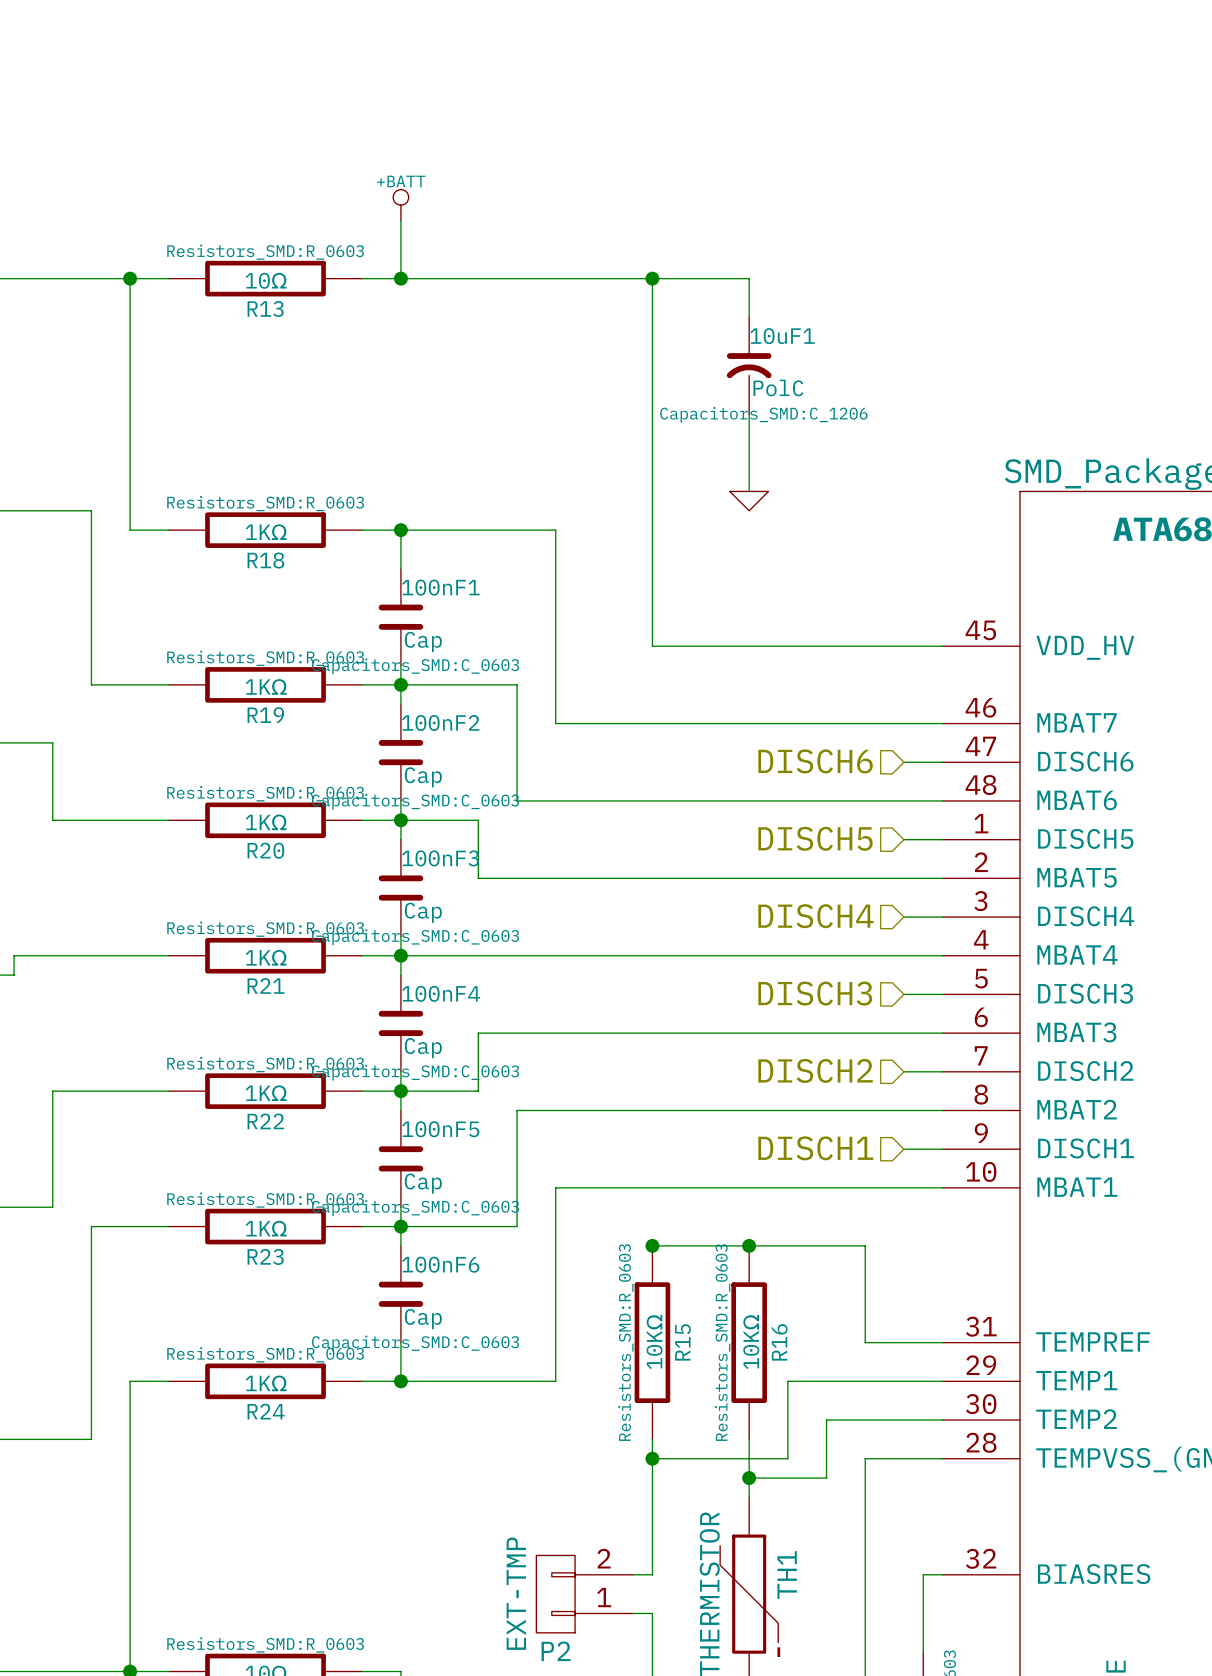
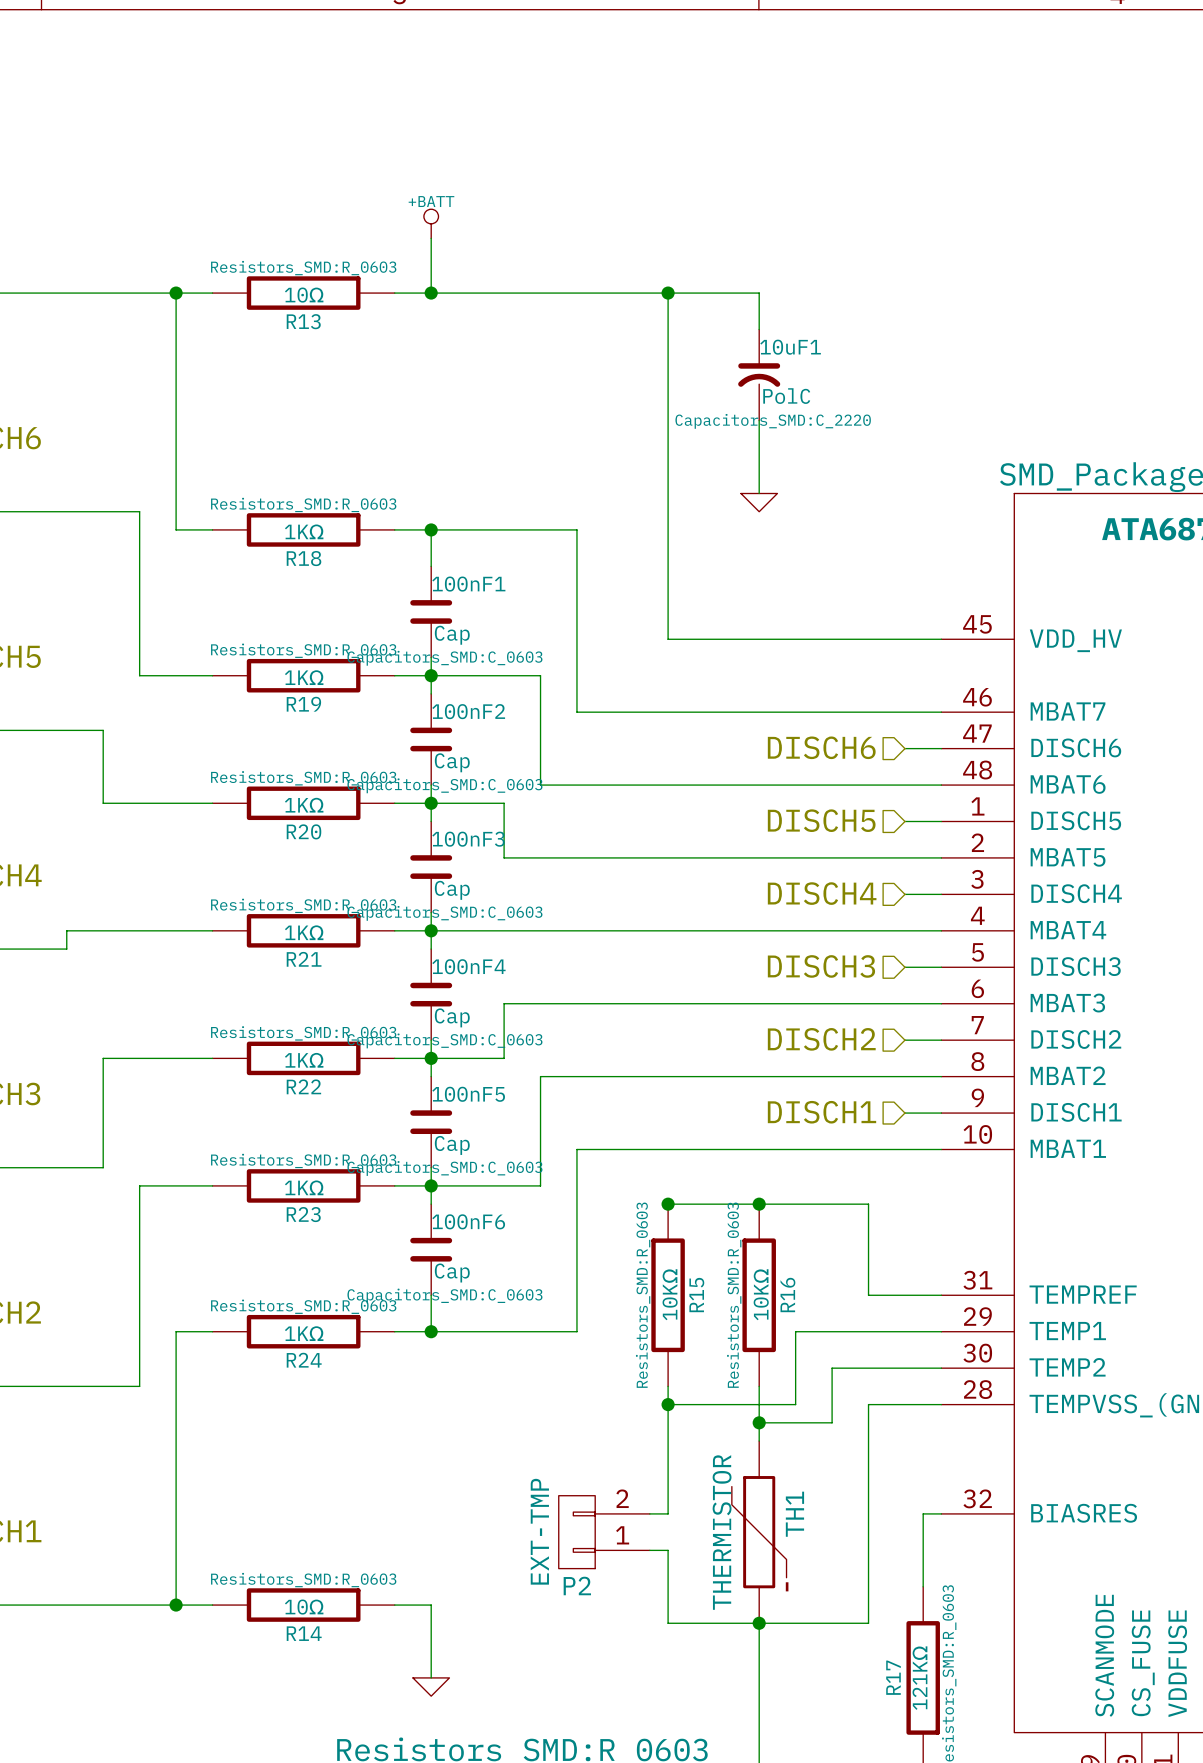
10uF1 text: Capacitors_SMD:C_1206 (763, 414) -> Capacitors_SMD:C_2220 (773, 421)

